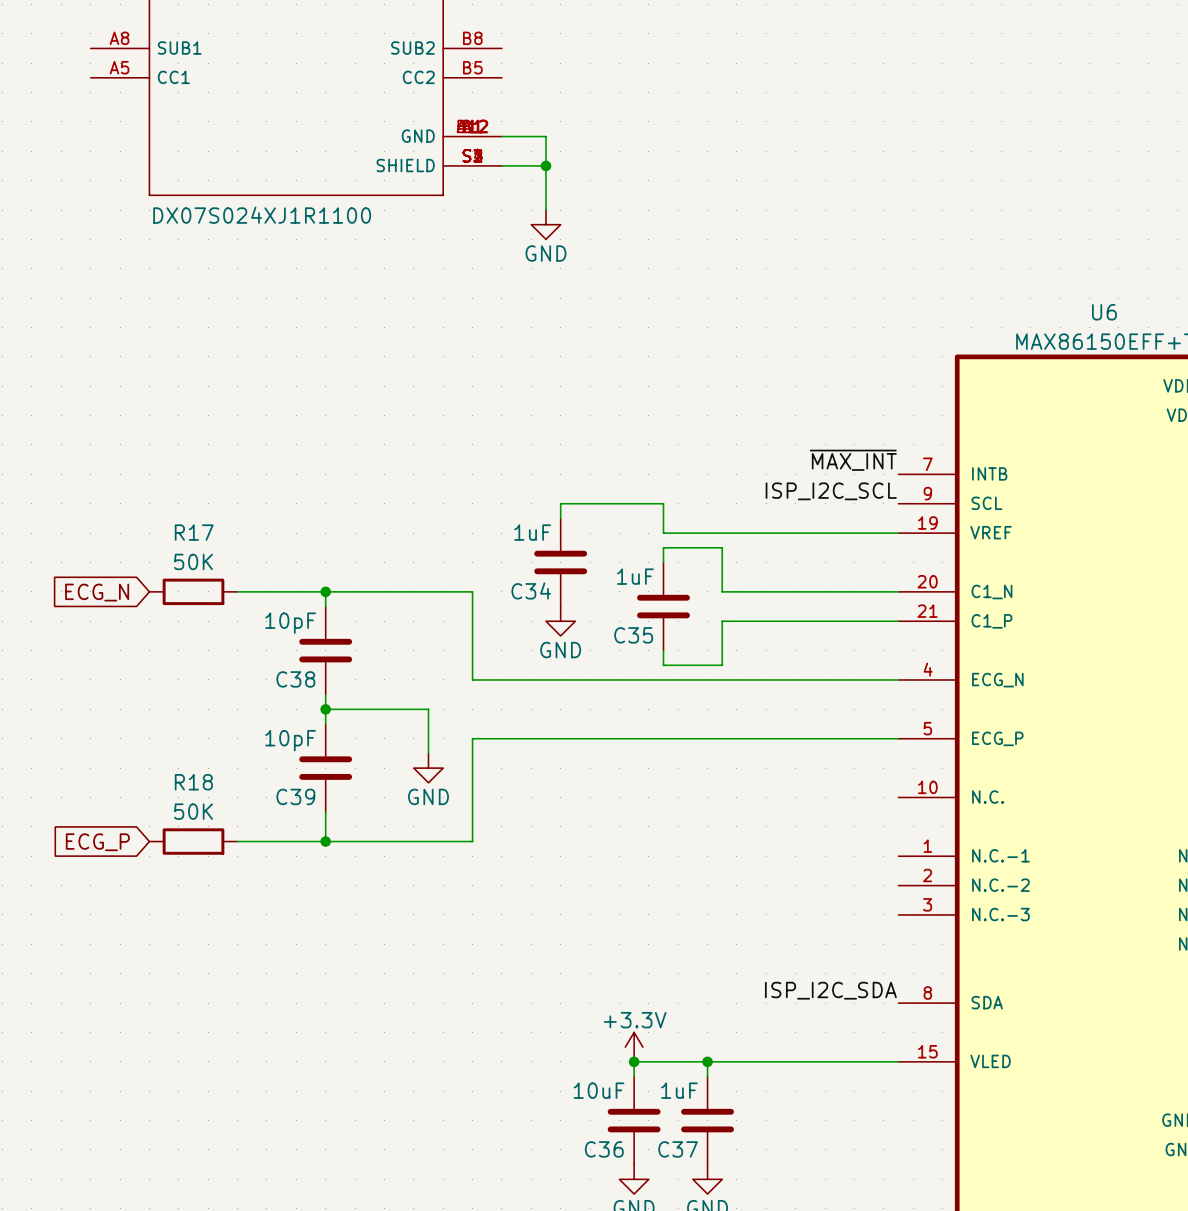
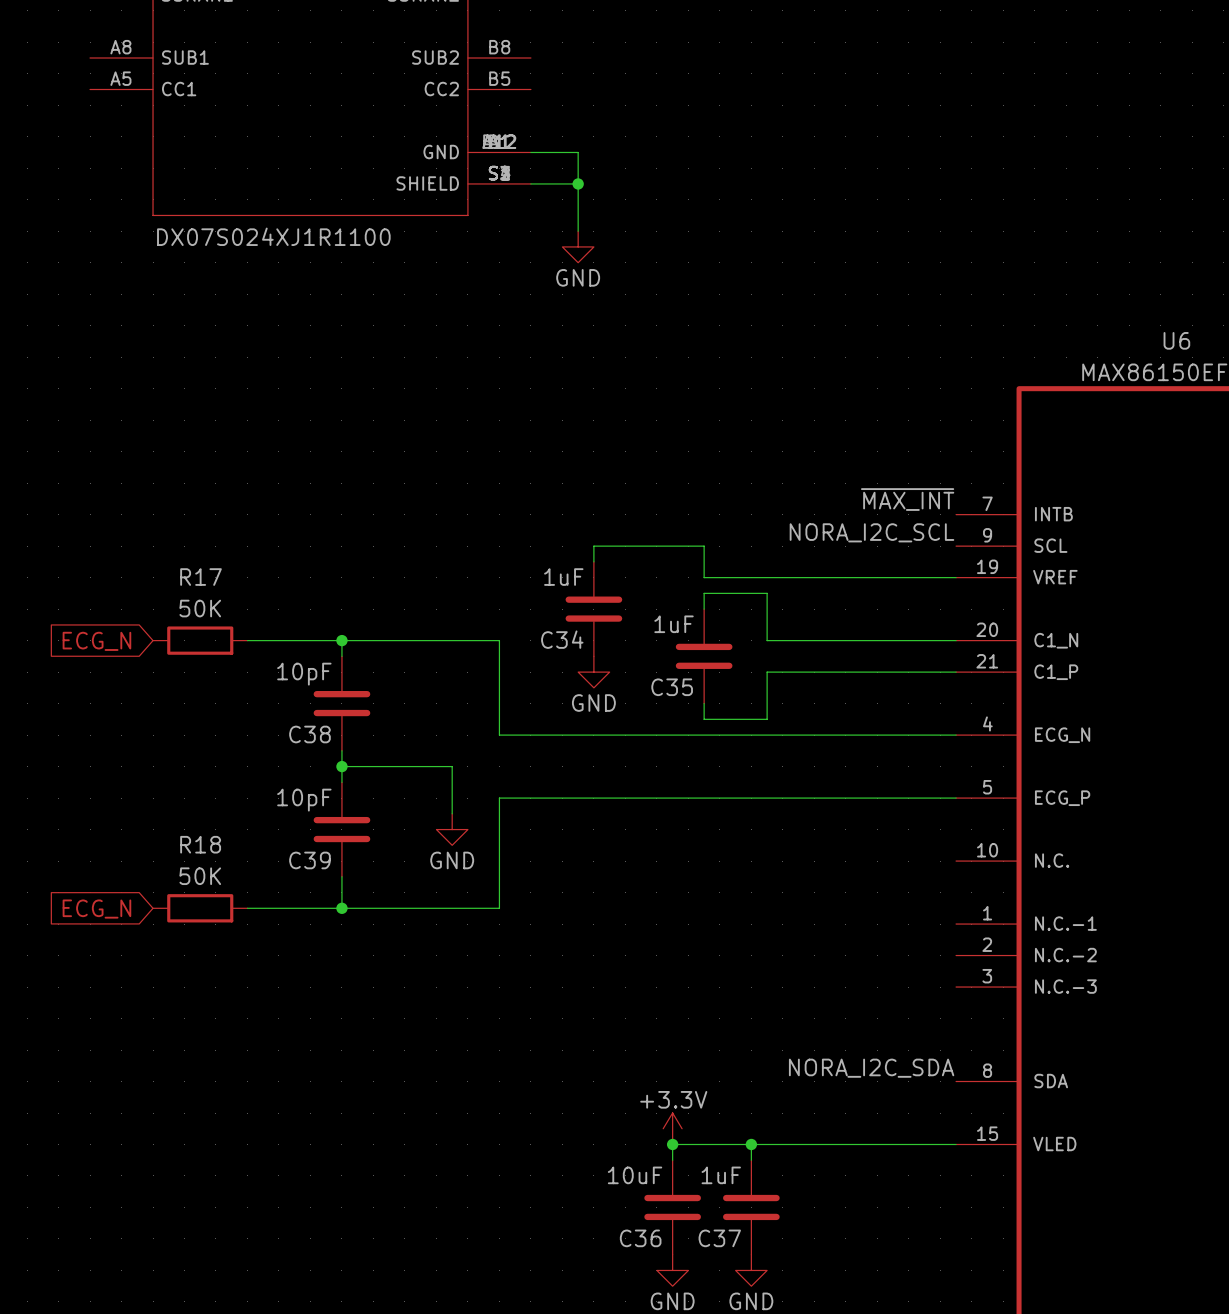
label: ISP_I2C_SCL (831, 491) -> NORA_I2C_SCL (871, 532)
global label: ECG_P (97, 842) -> ECG_N (96, 909)
label: ISP_I2C_SDA (830, 990) -> NORA_I2C_SDA (871, 1068)

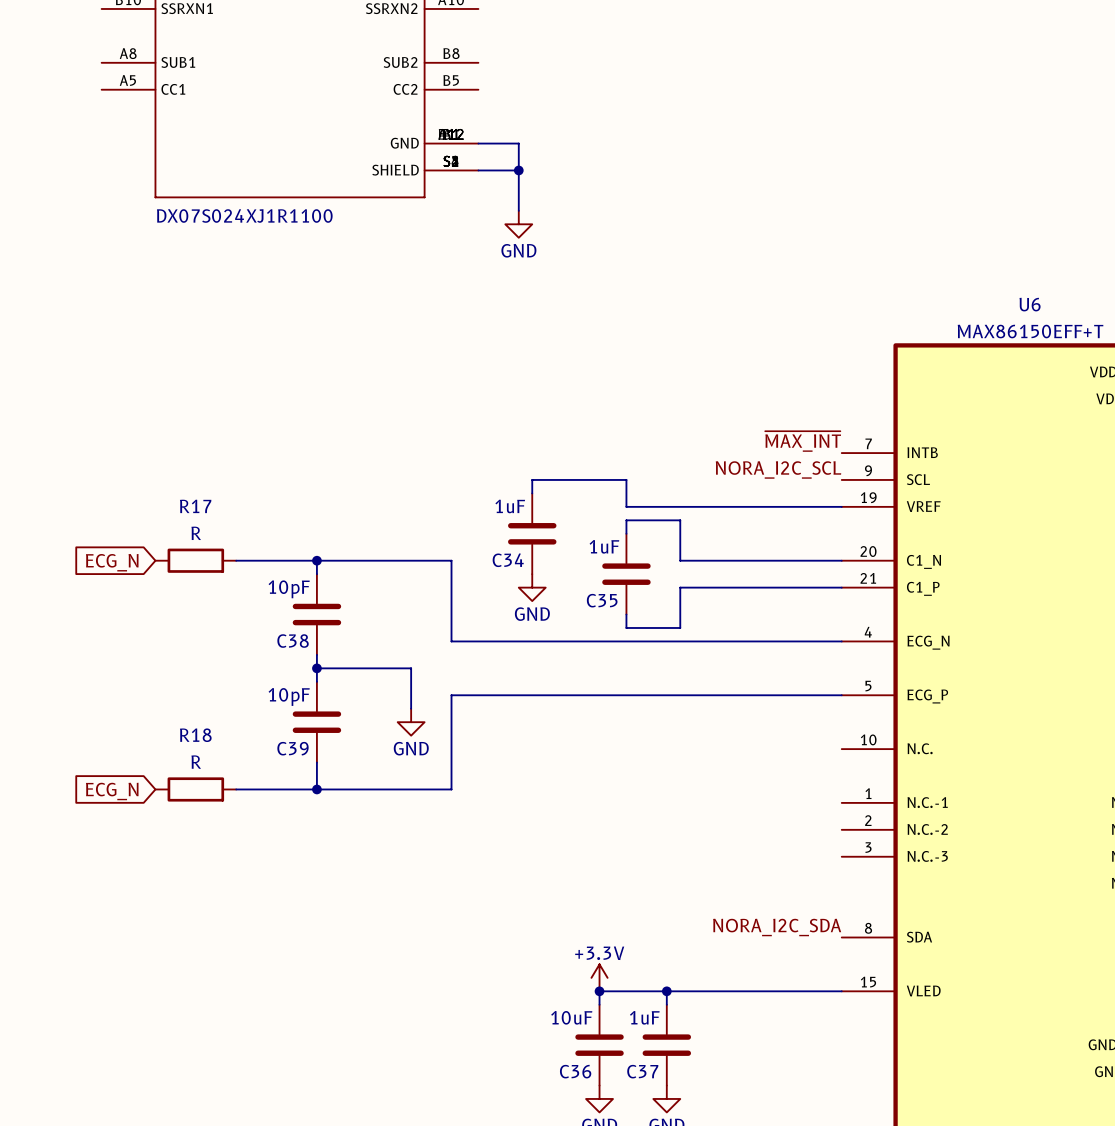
R17 value: 50K (200, 608) -> R (196, 533)
R18 value: 50K (200, 876) -> R (196, 762)

